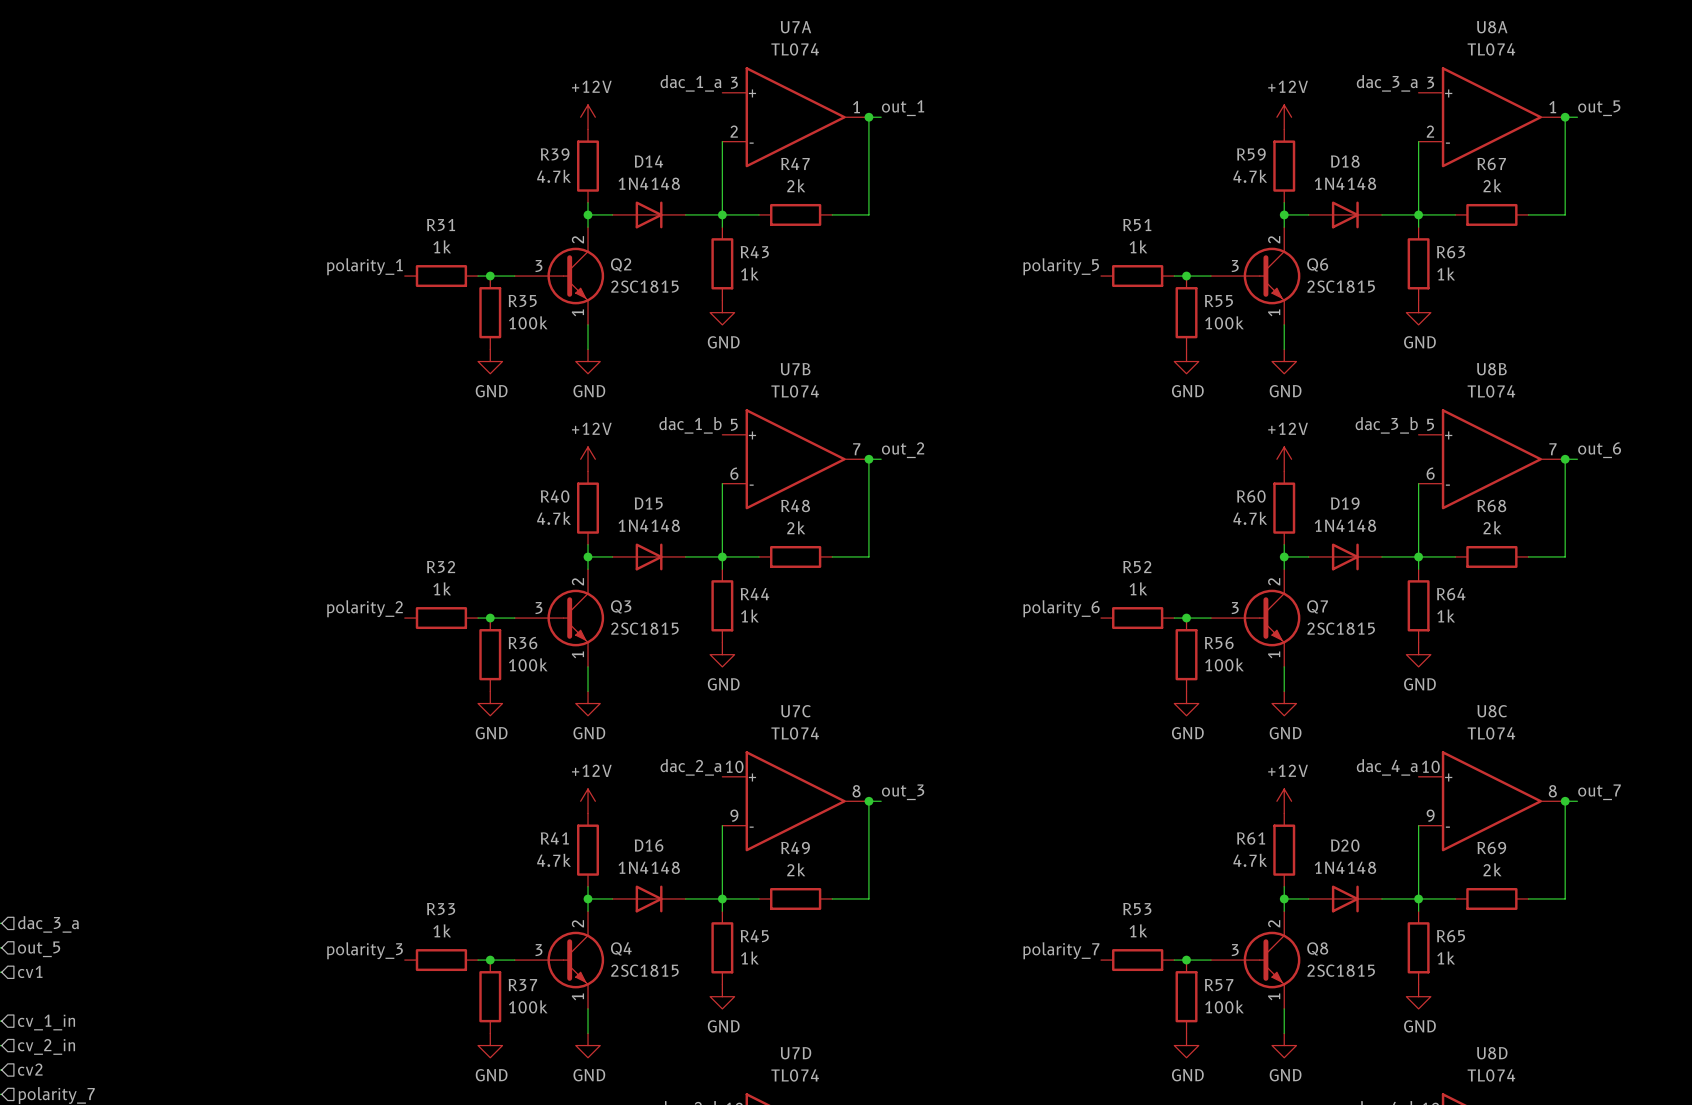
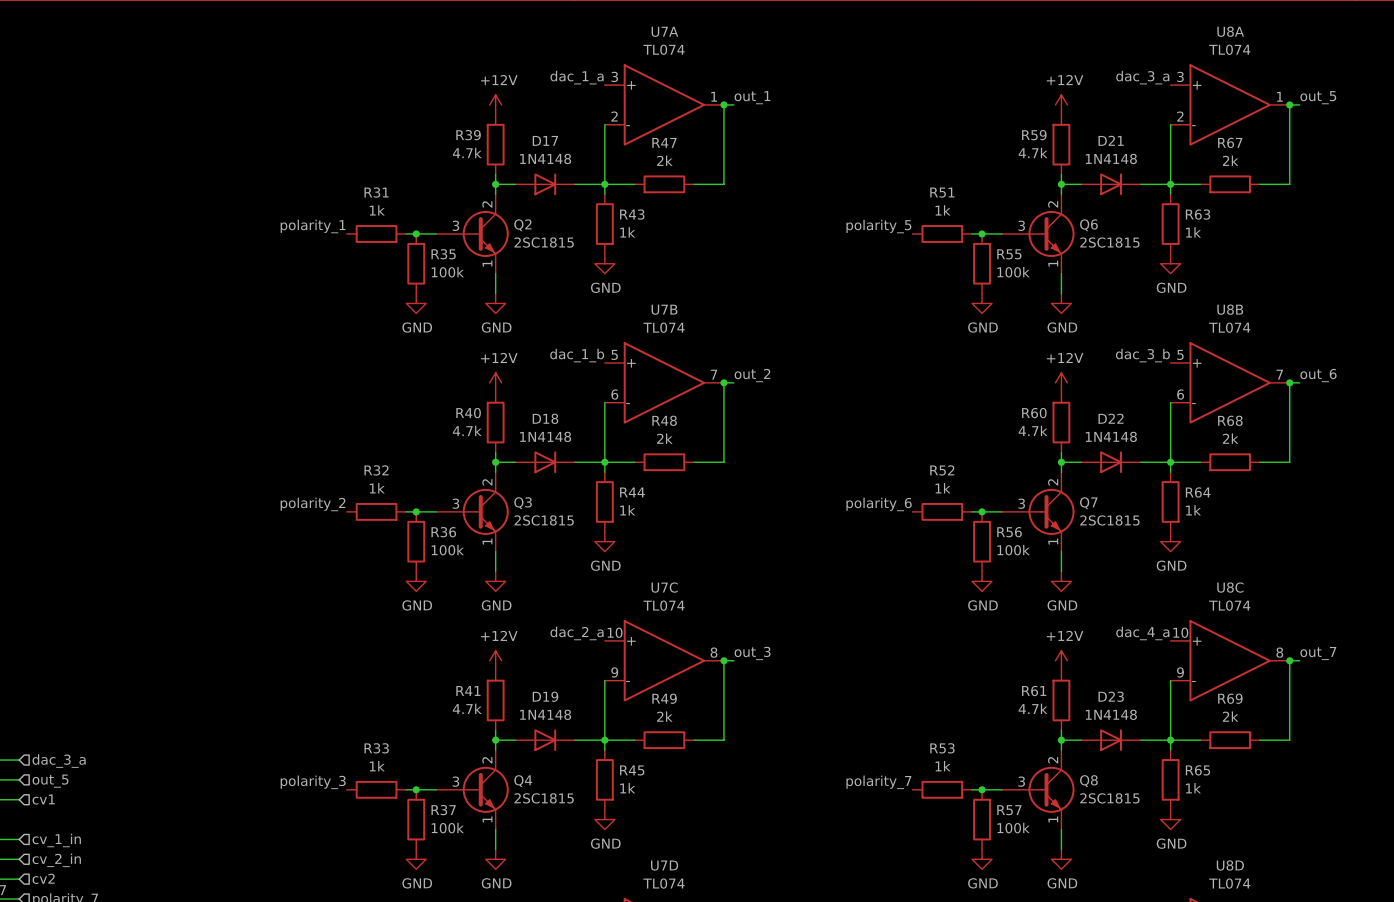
D14 name: D14 (648, 161) -> D17 (545, 140)
D18 name: D18 (1345, 161) -> D21 (1111, 140)
D15 name: D15 (648, 503) -> D18 (545, 418)
D19 name: D19 (1345, 503) -> D22 (1111, 418)
D16 name: D16 (649, 845) -> D19 (545, 696)
D20 name: D20 (1345, 845) -> D23 (1111, 696)

